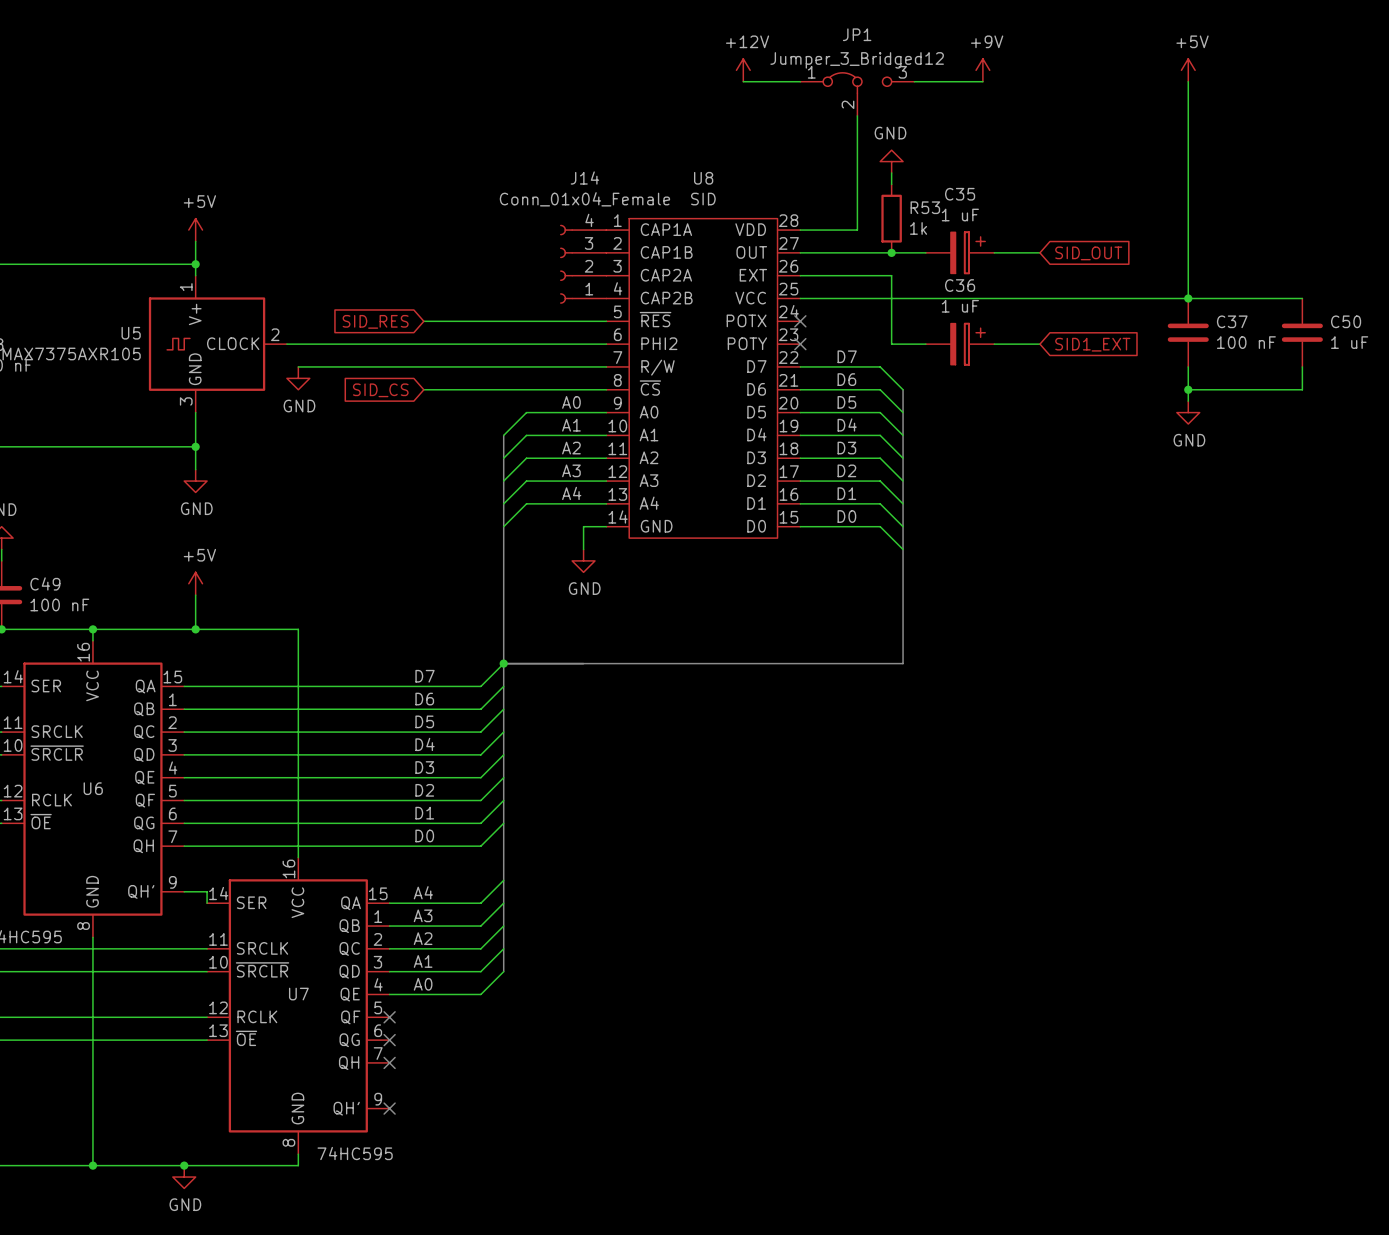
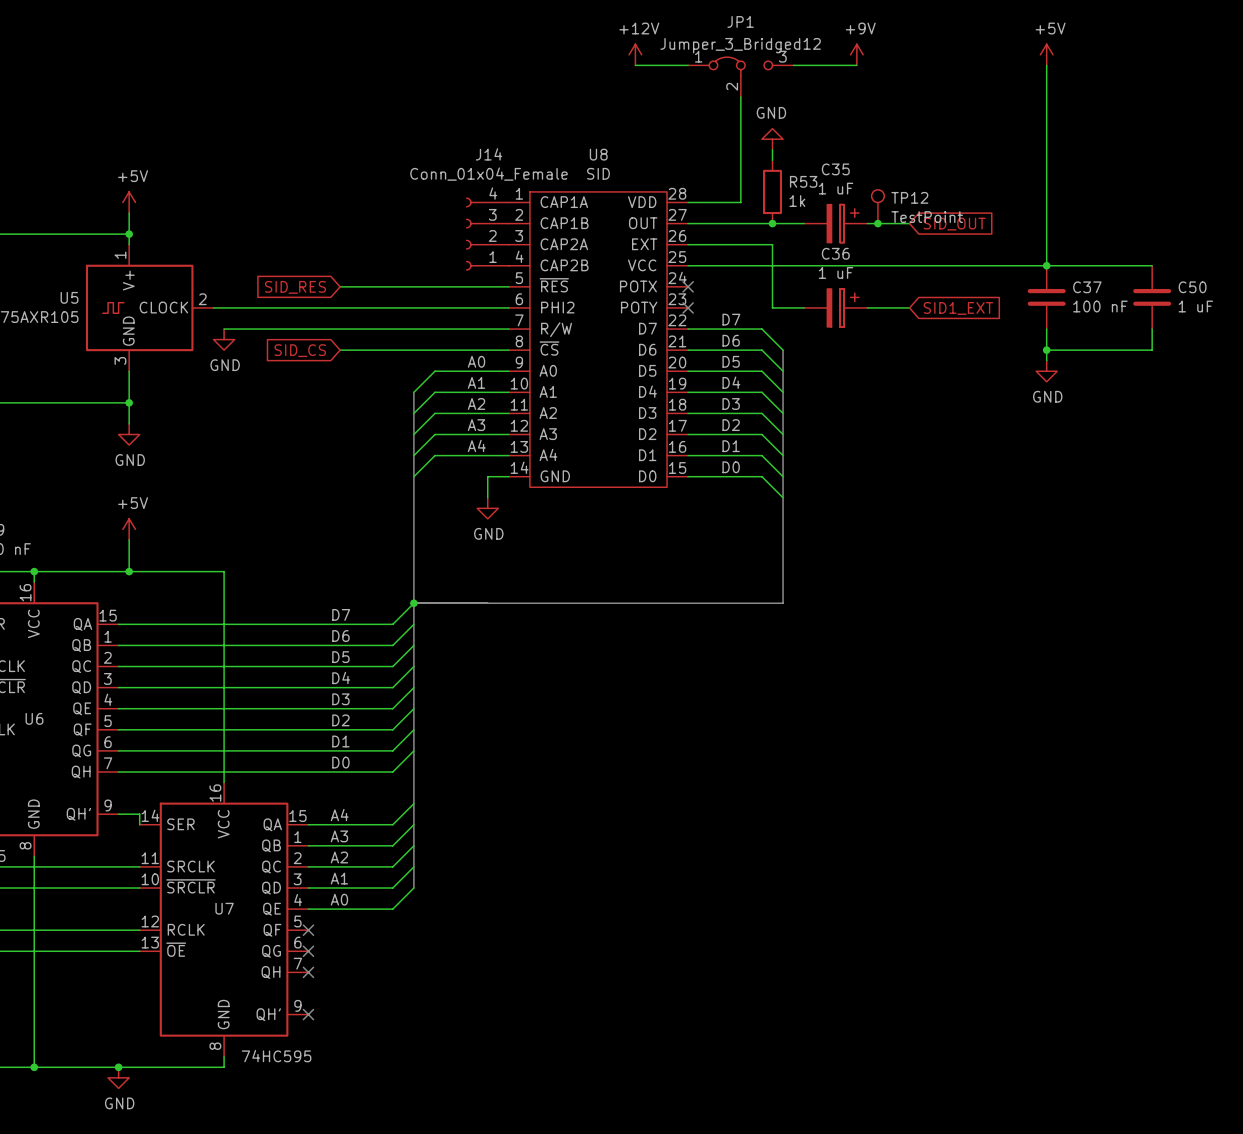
TP12: none -> TestPoint (877, 206)
junction: none -> (877, 223)

